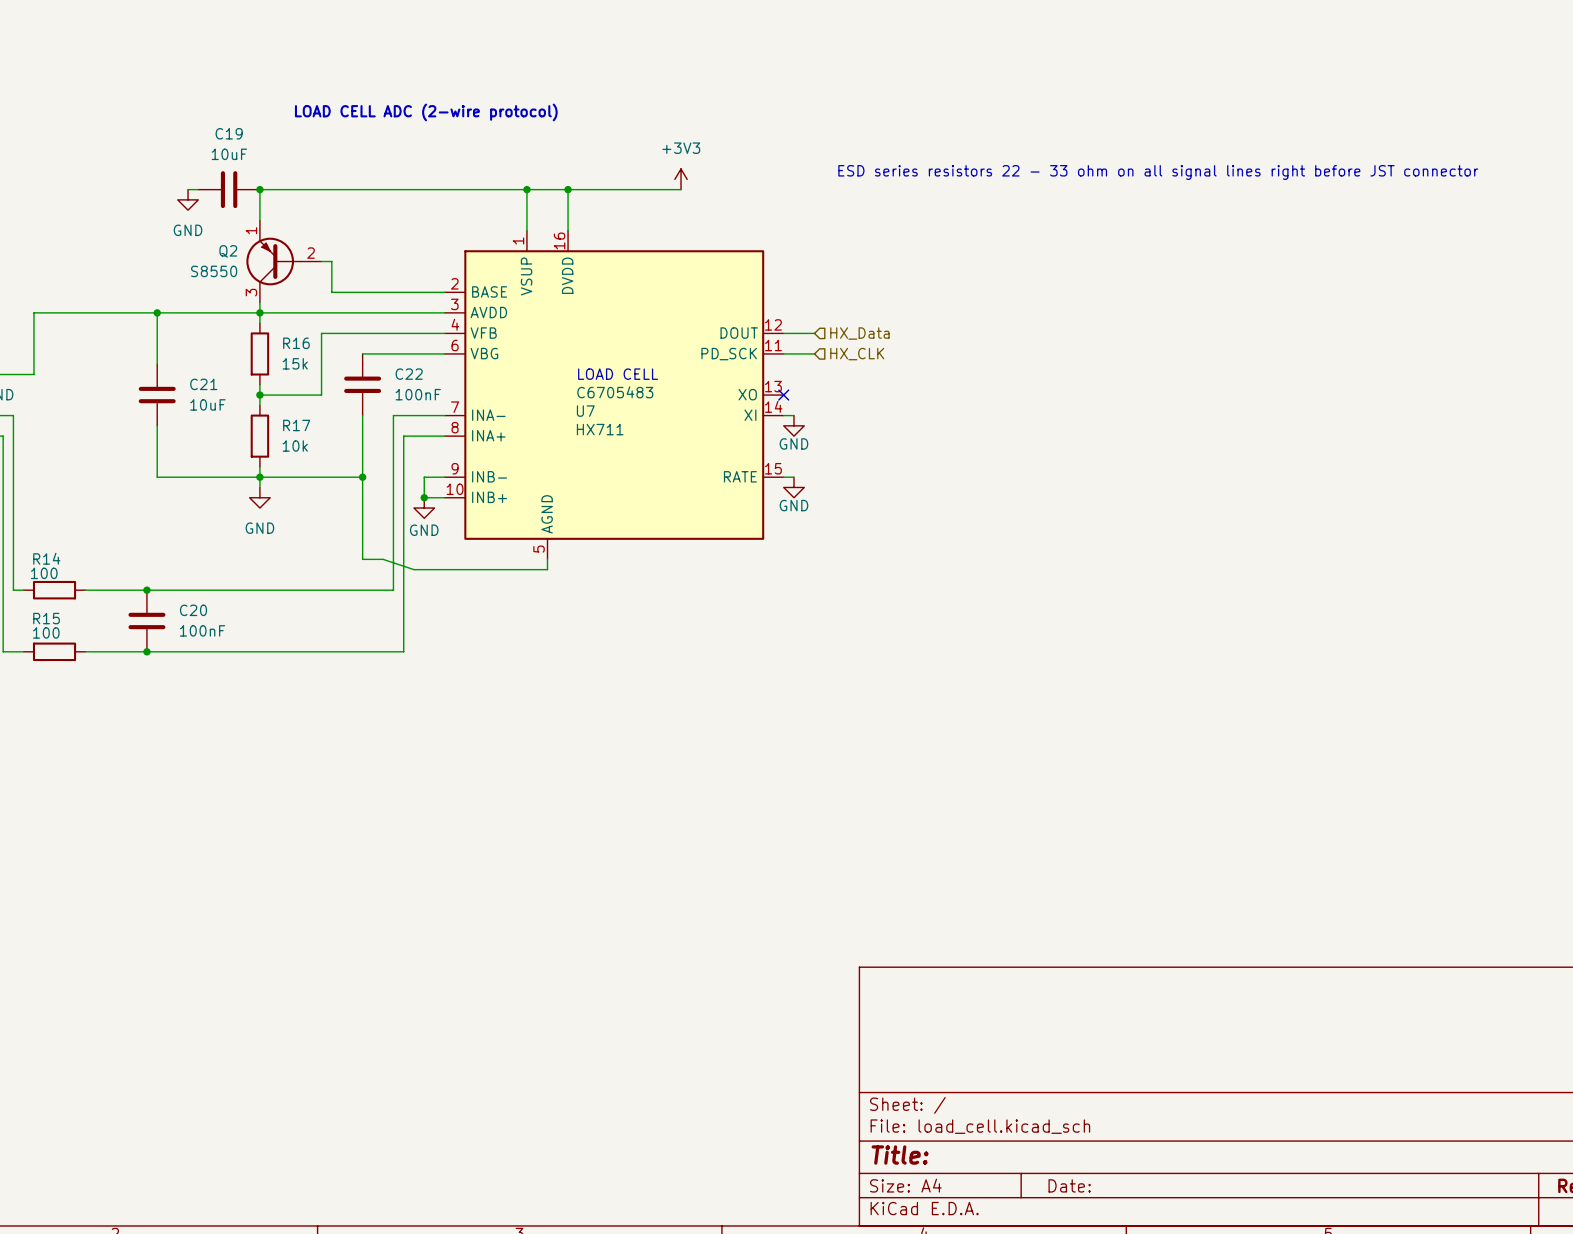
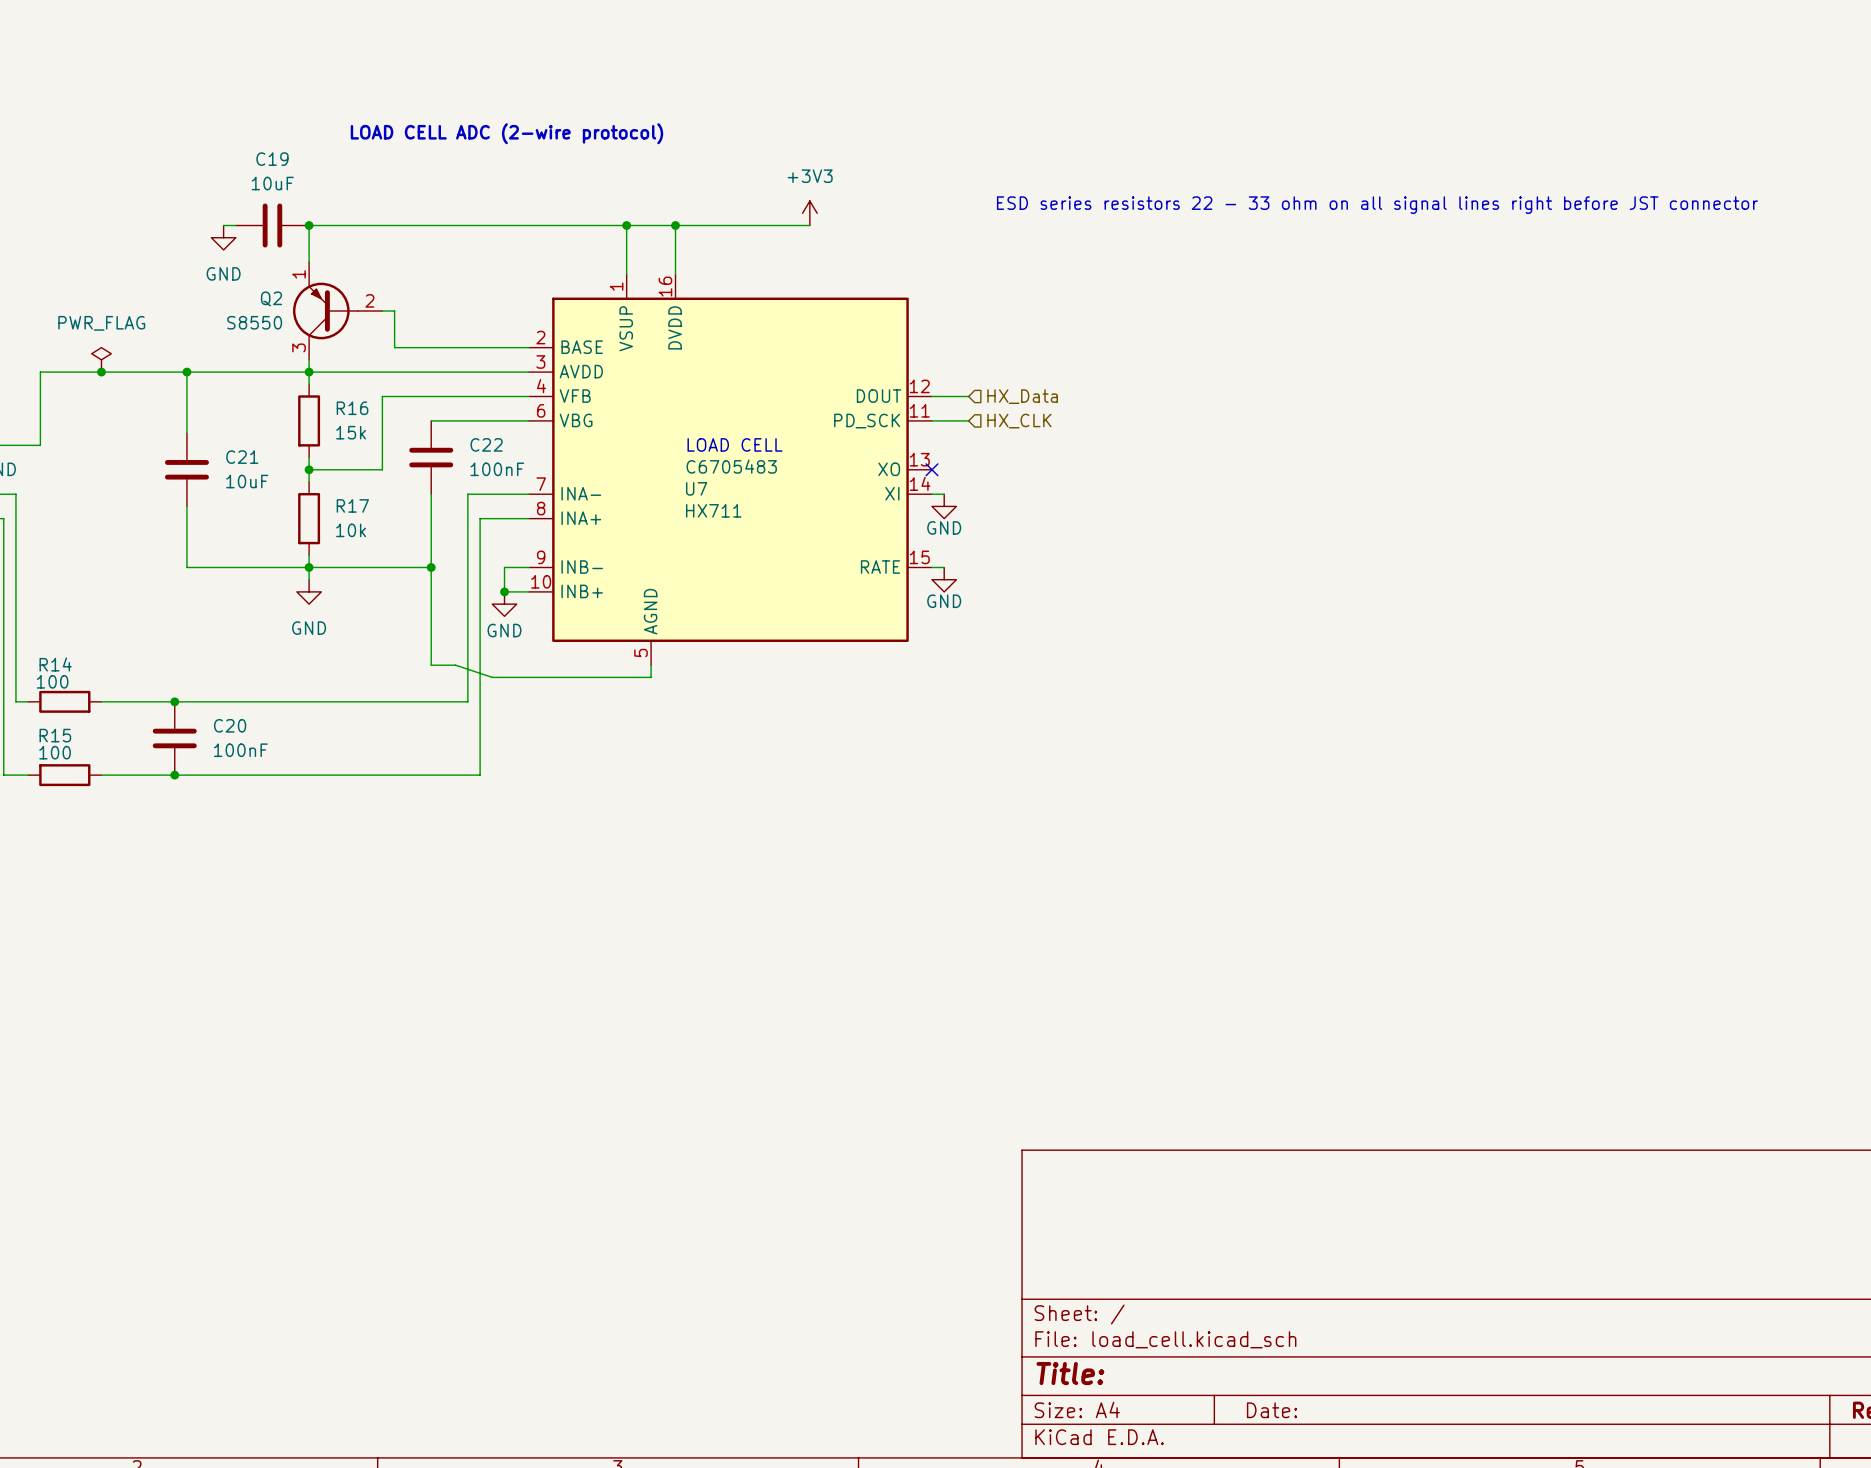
power symbol: none -> PWR_FLAG (101, 359)
junction: none -> (101, 372)

